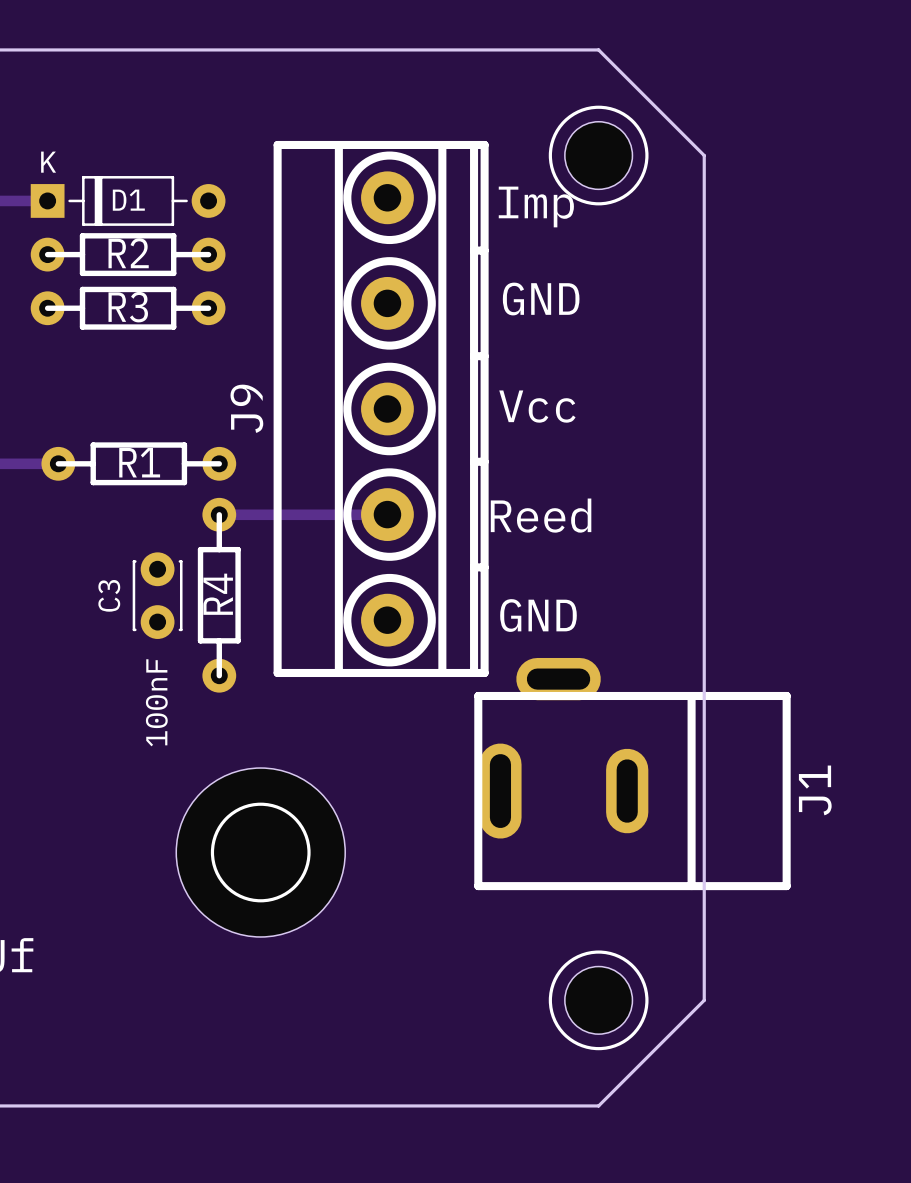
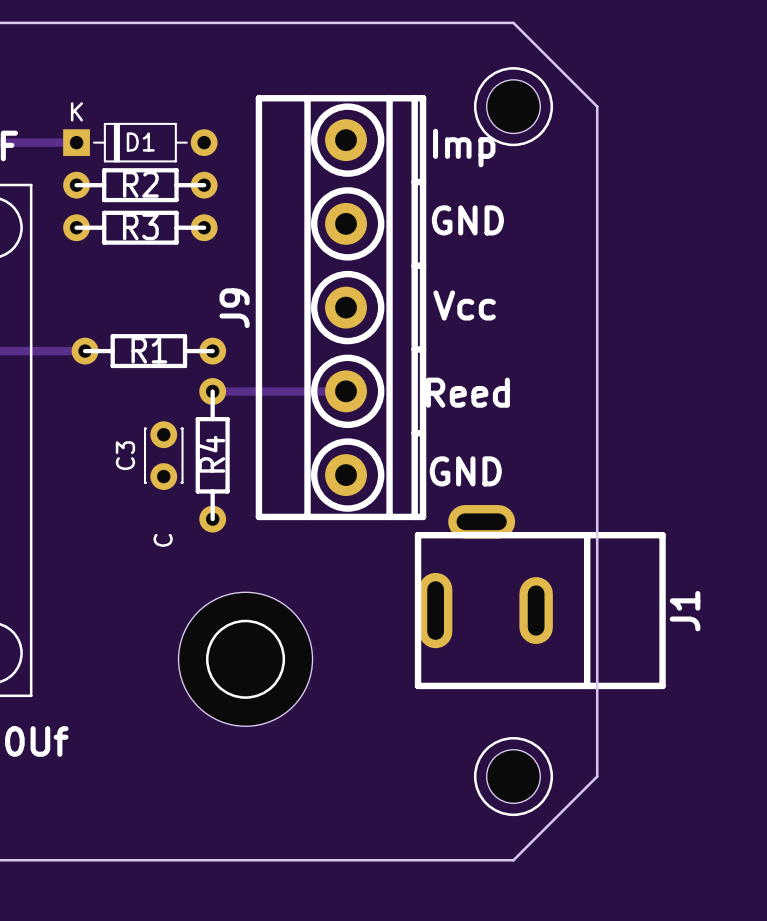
C3 value: 100nF (156, 702) -> C (163, 540)

